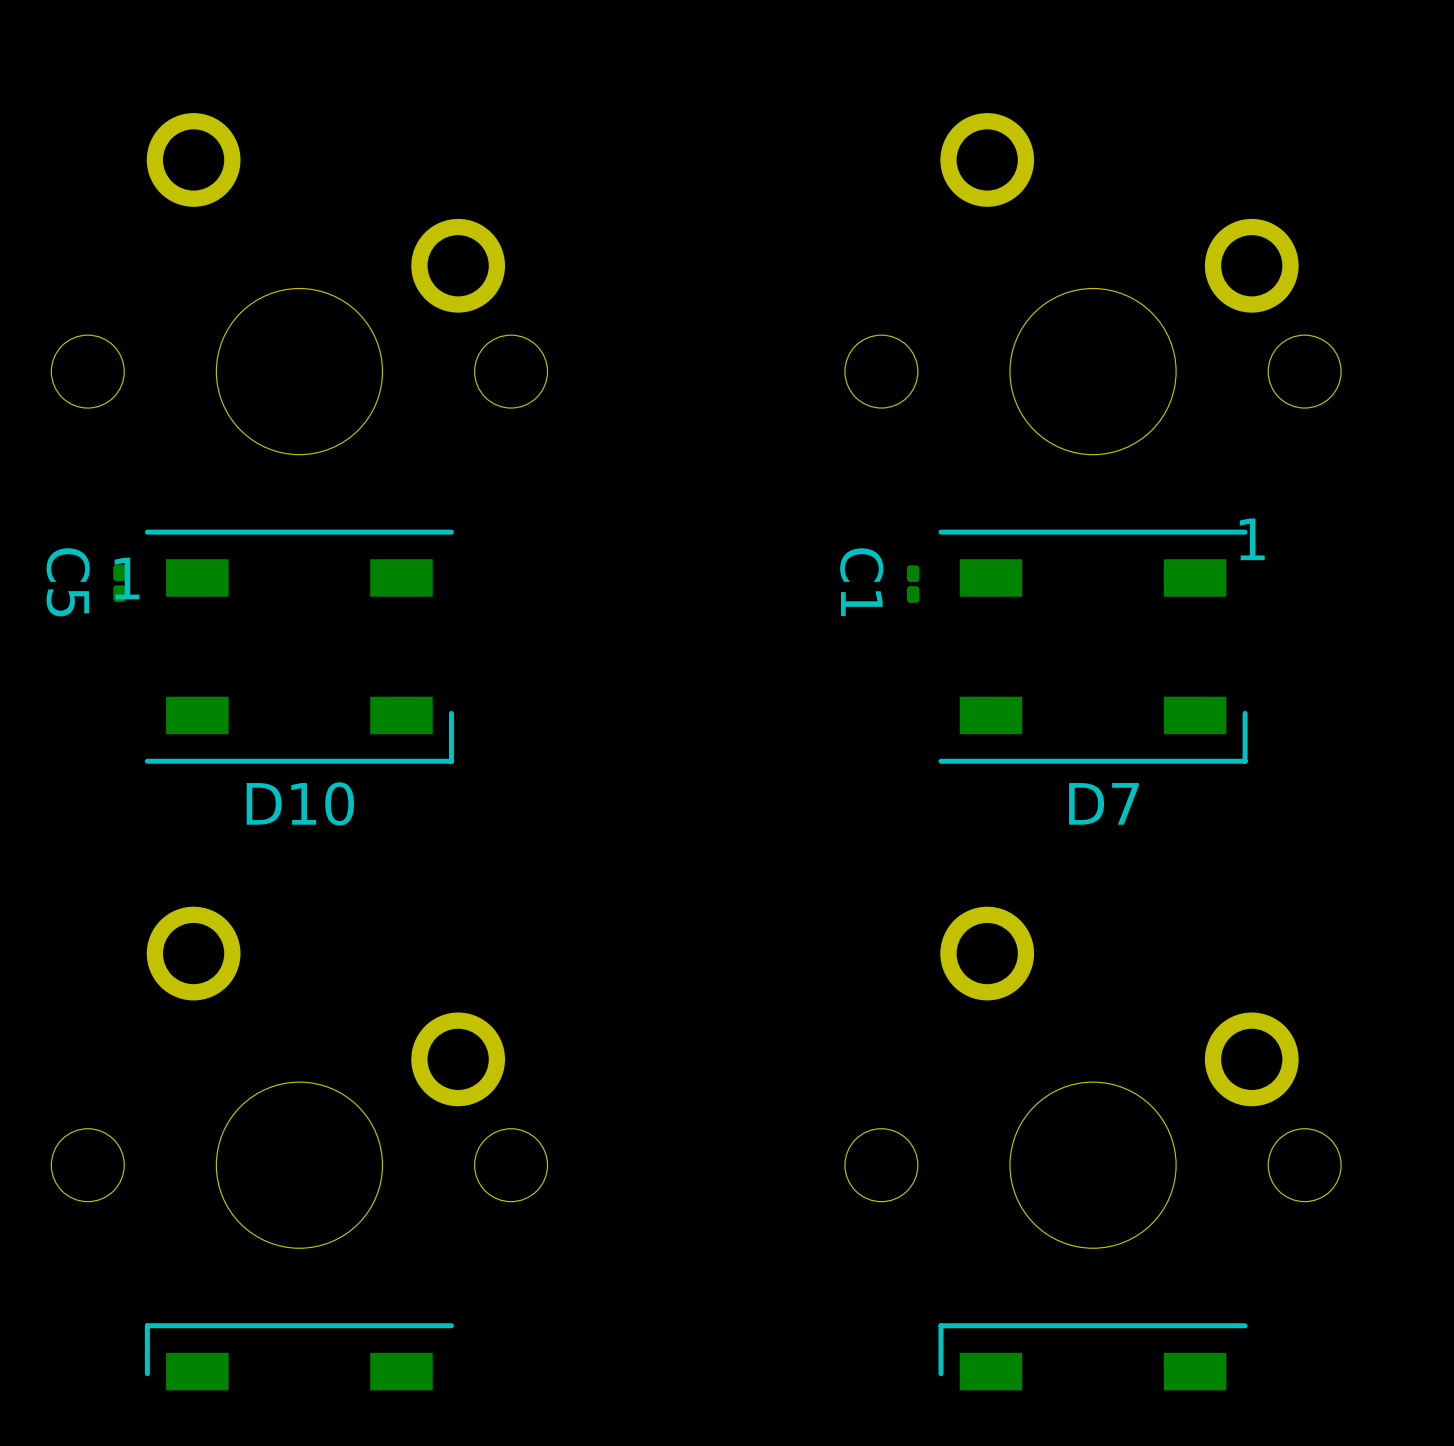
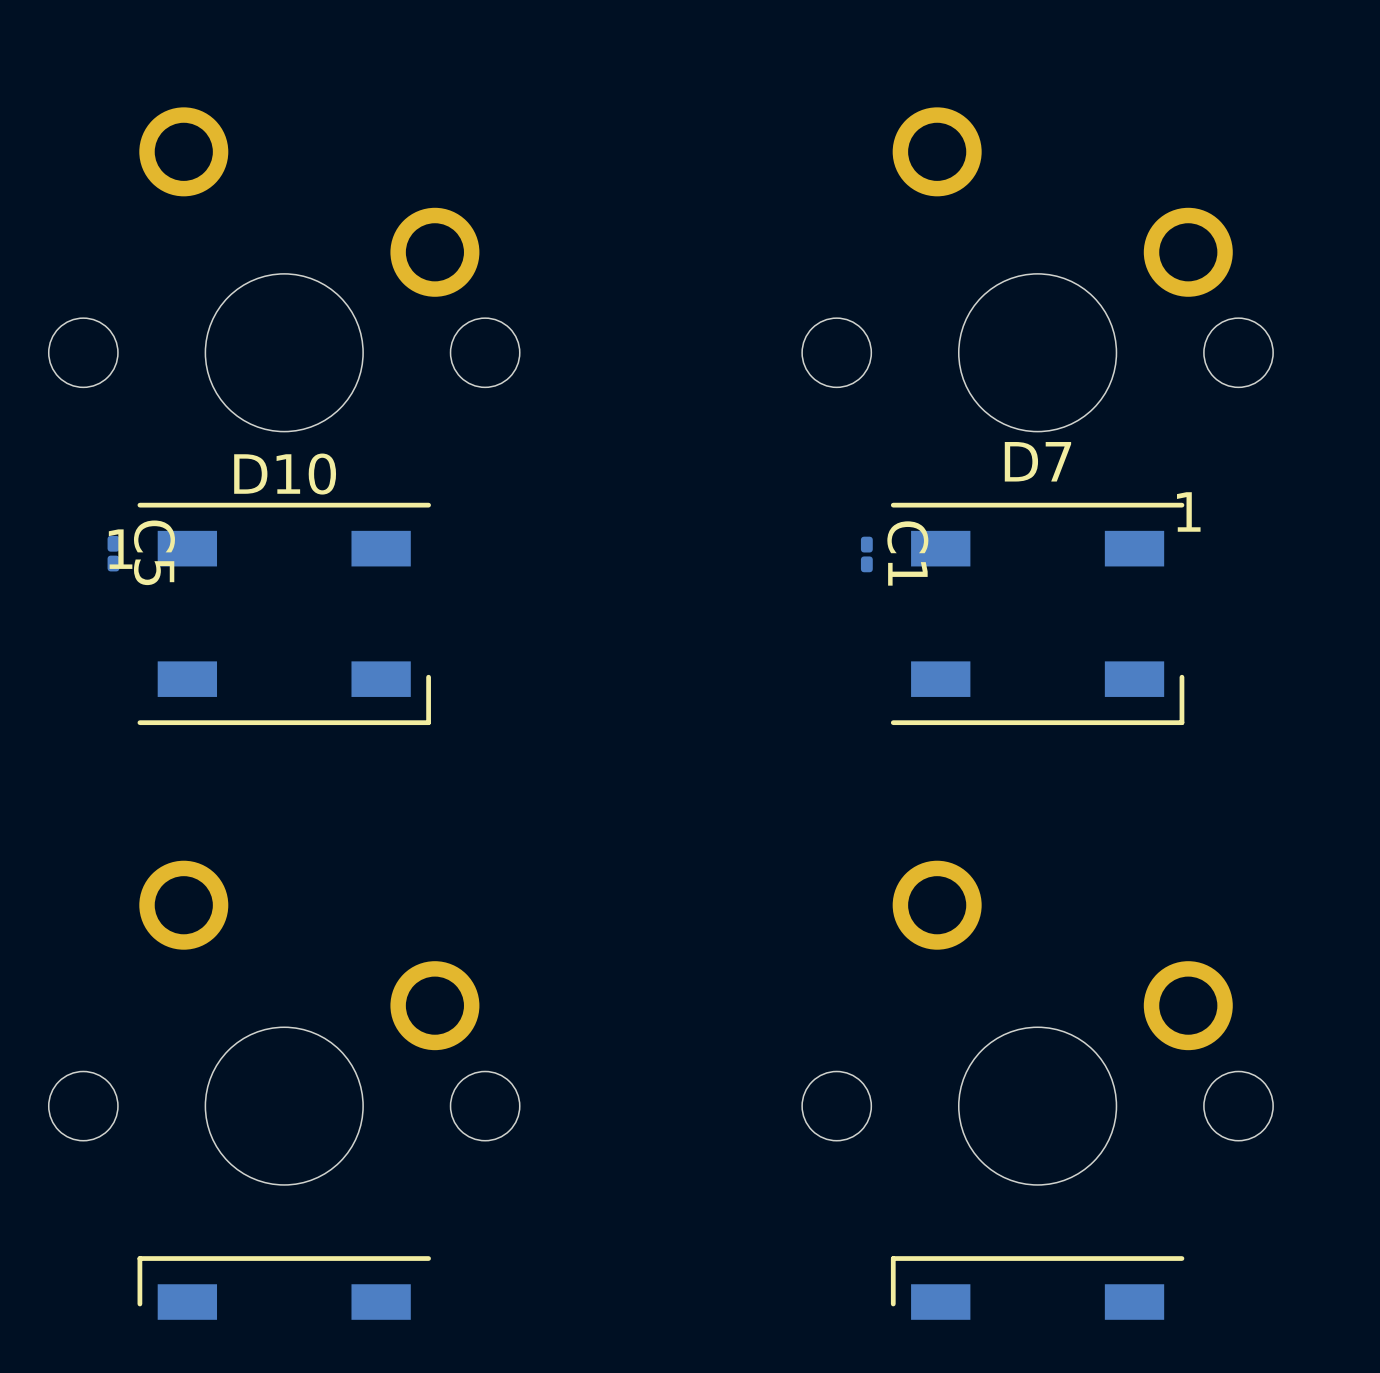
C5 name position: C5 (68, 582) -> C5 (154, 552)
C1 name position: C1 (861, 582) -> C1 (907, 553)
D10 name position: D10 (300, 803) -> D10 (285, 474)
D7 name position: D7 (1103, 803) -> D7 (1037, 461)

